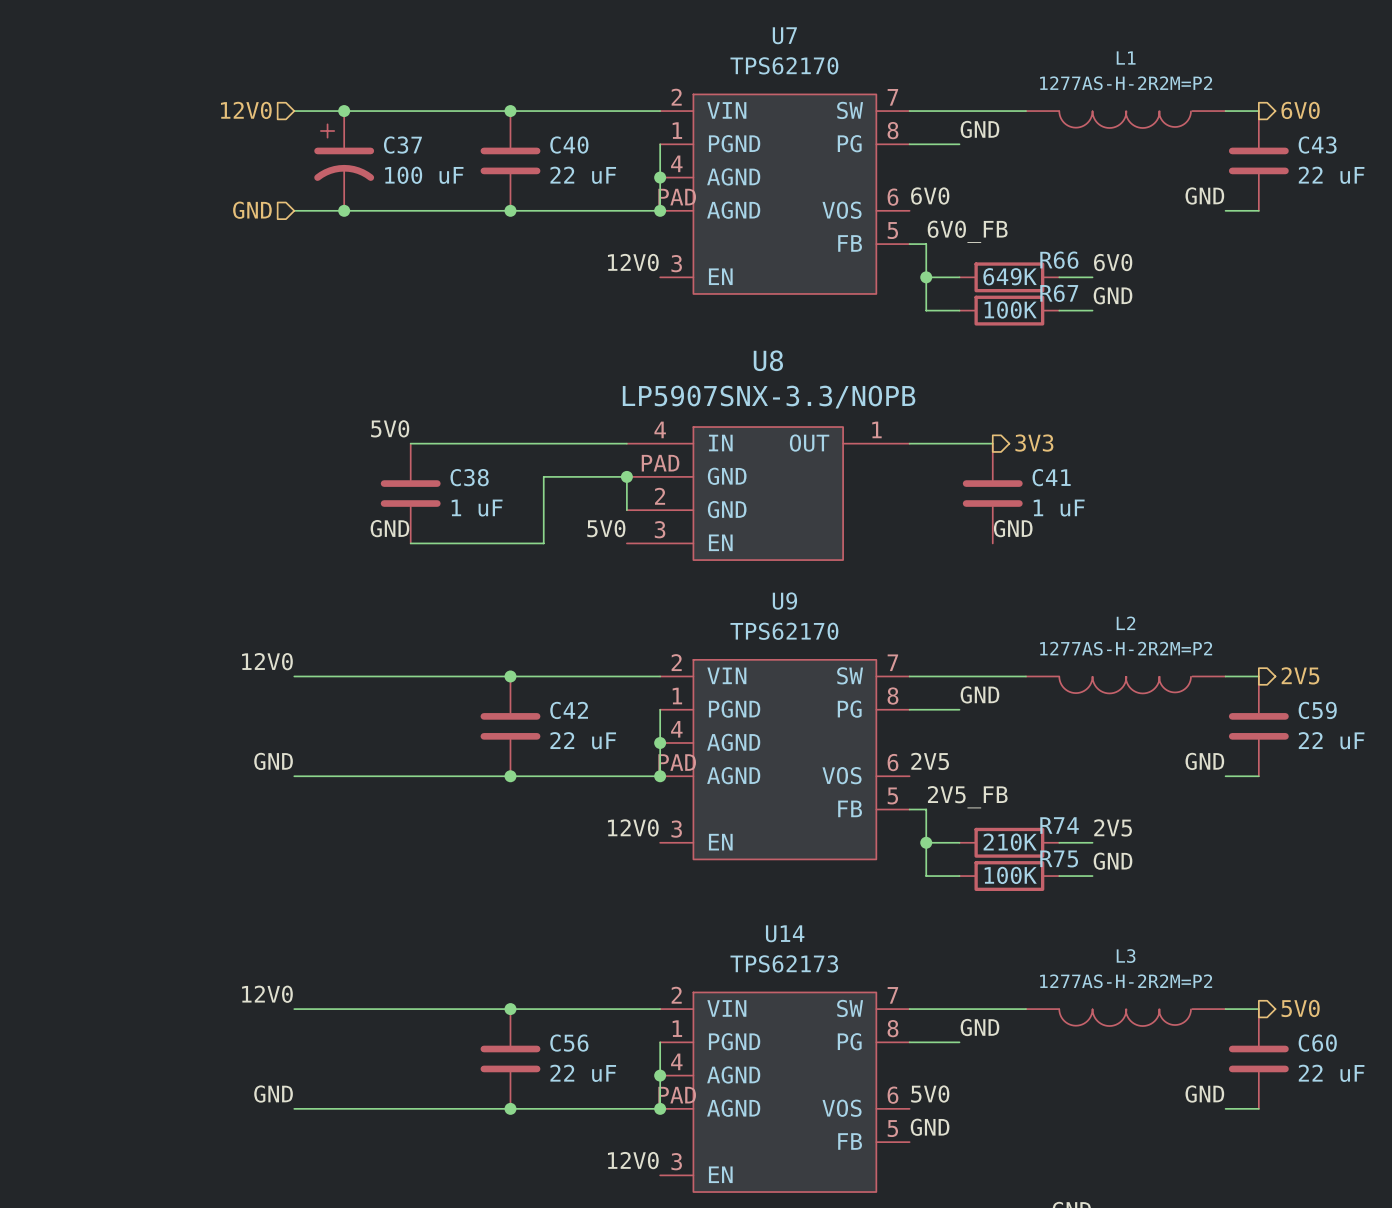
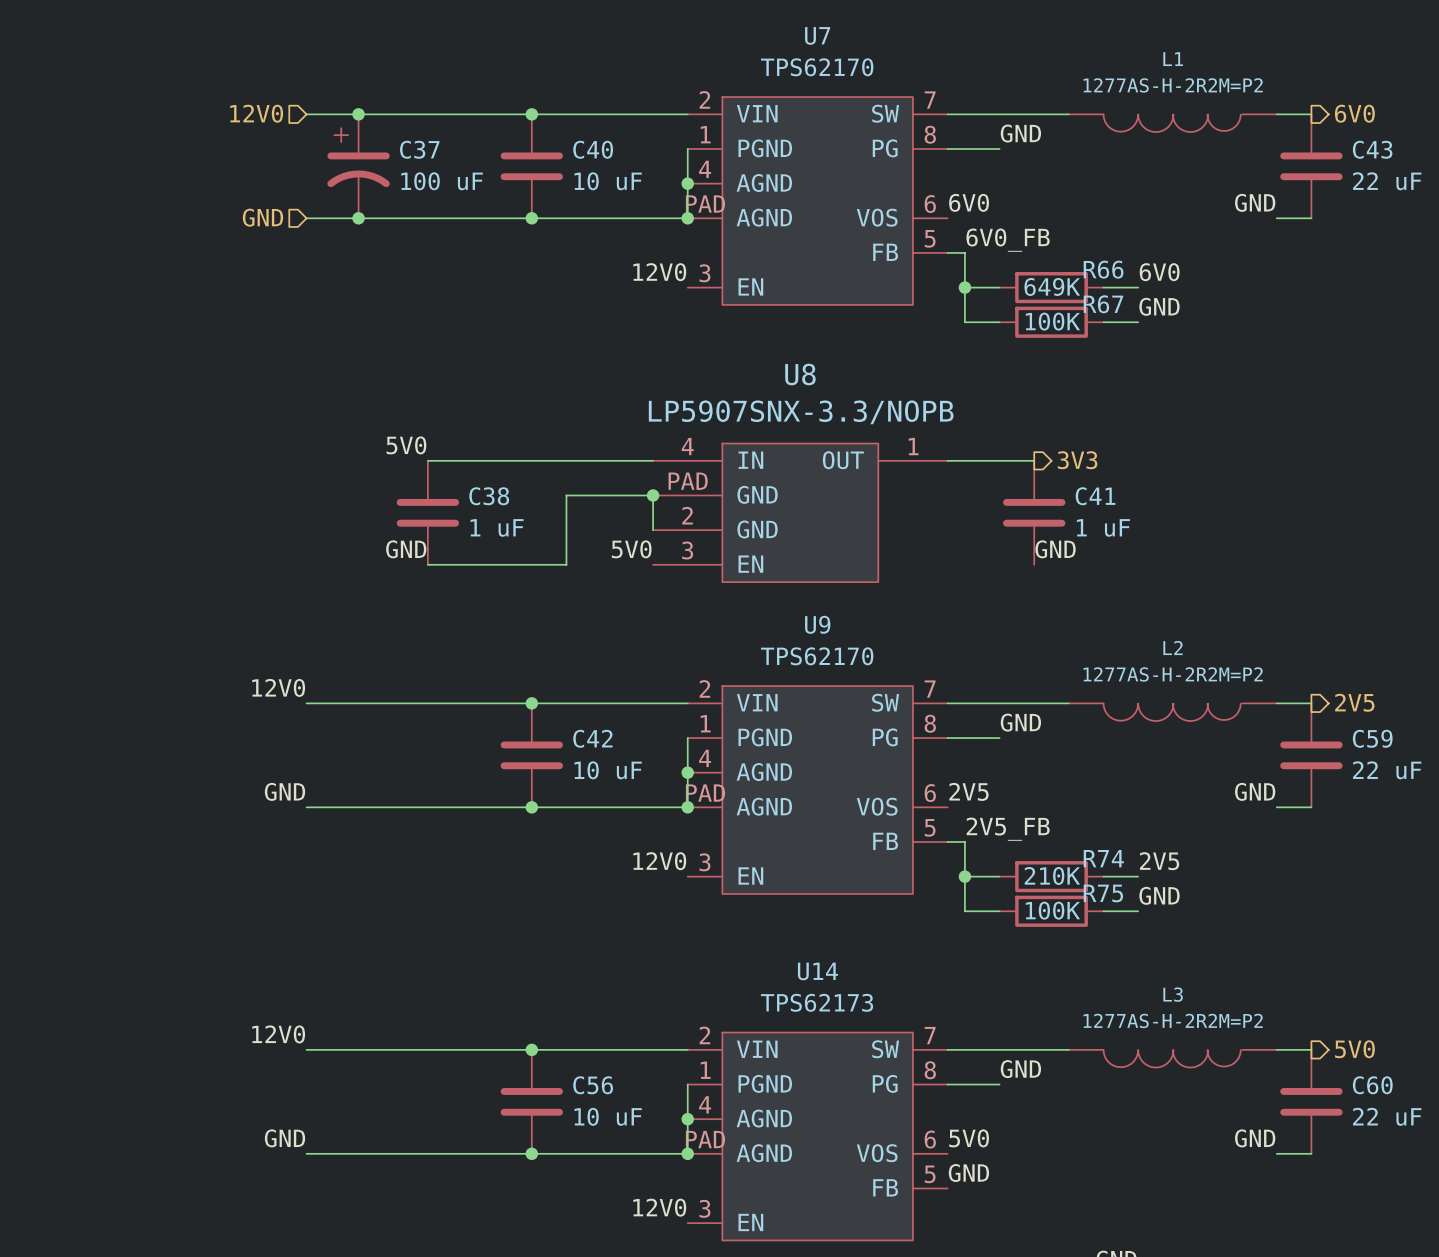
C40 value: 22 uF (583, 175) -> 10 uF (608, 181)
C42 value: 22 uF (583, 740) -> 10 uF (608, 770)
C56 value: 22 uF (583, 1073) -> 10 uF (608, 1116)

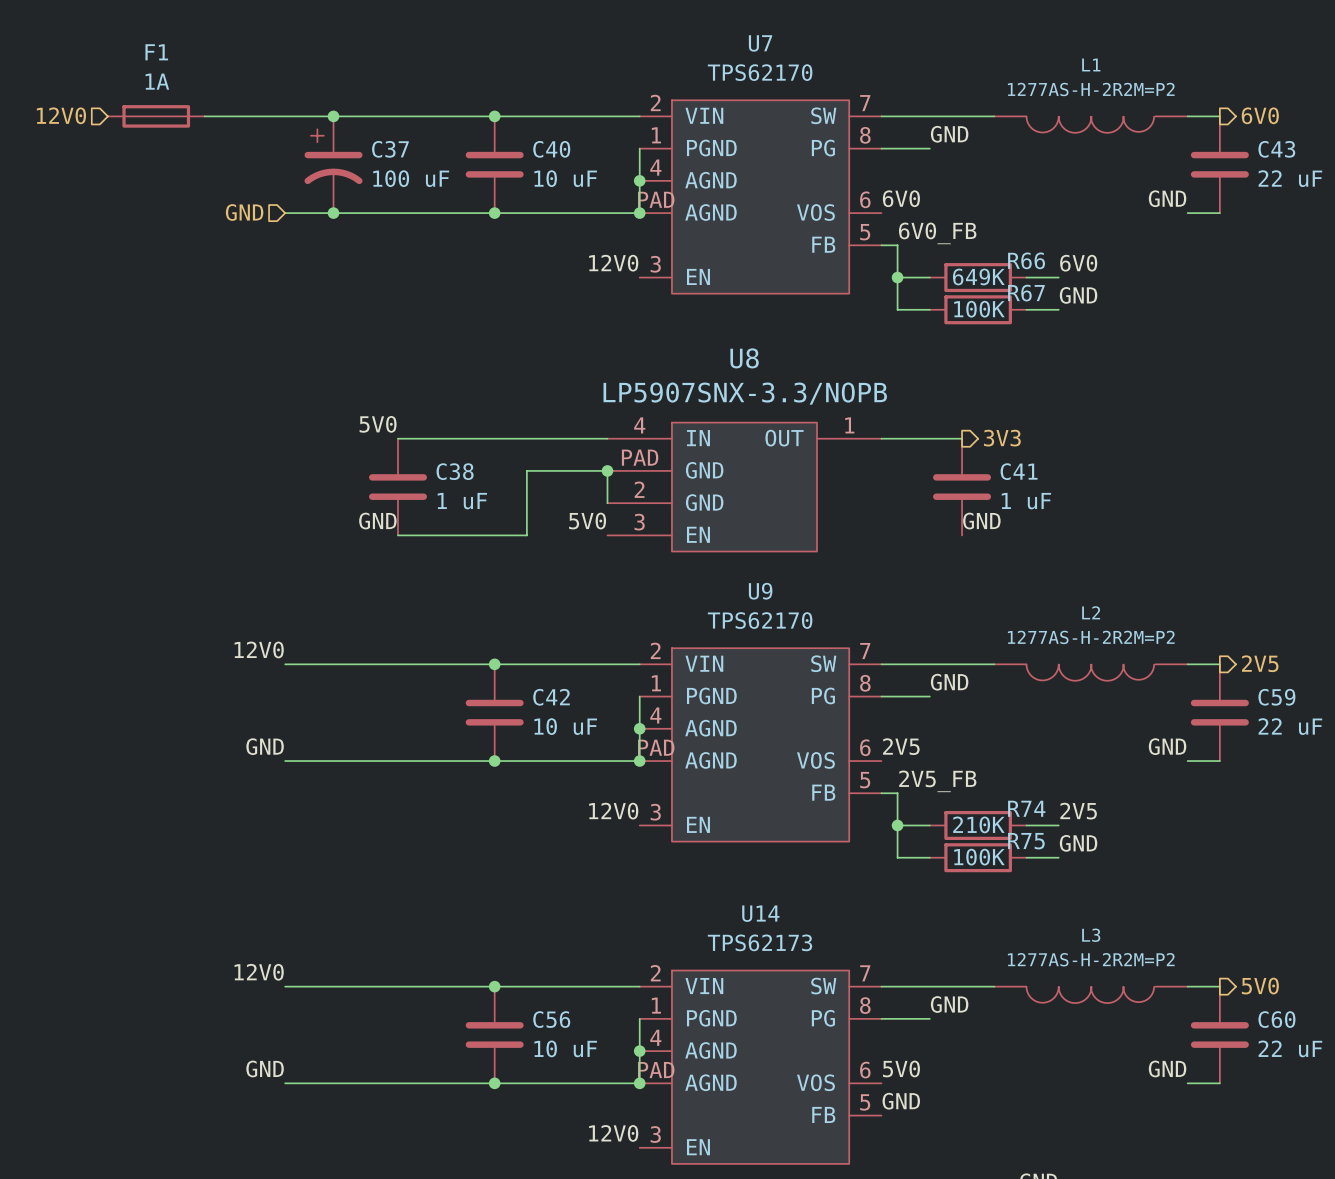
hierarchical label position: 12V0 (256, 113) -> 12V0 (61, 115)
F1: none -> 1A (156, 116)
wire: none -> (204, 116) (285, 116)

